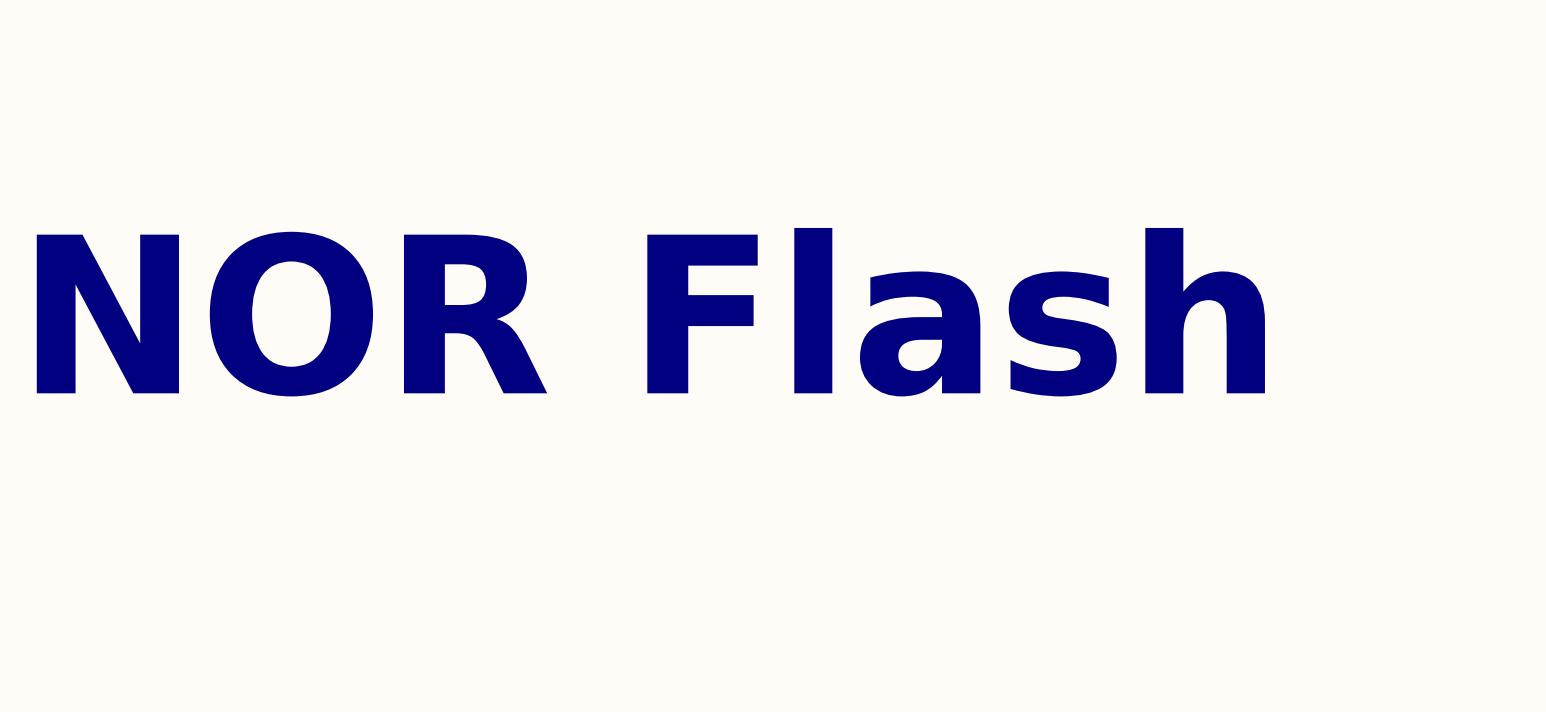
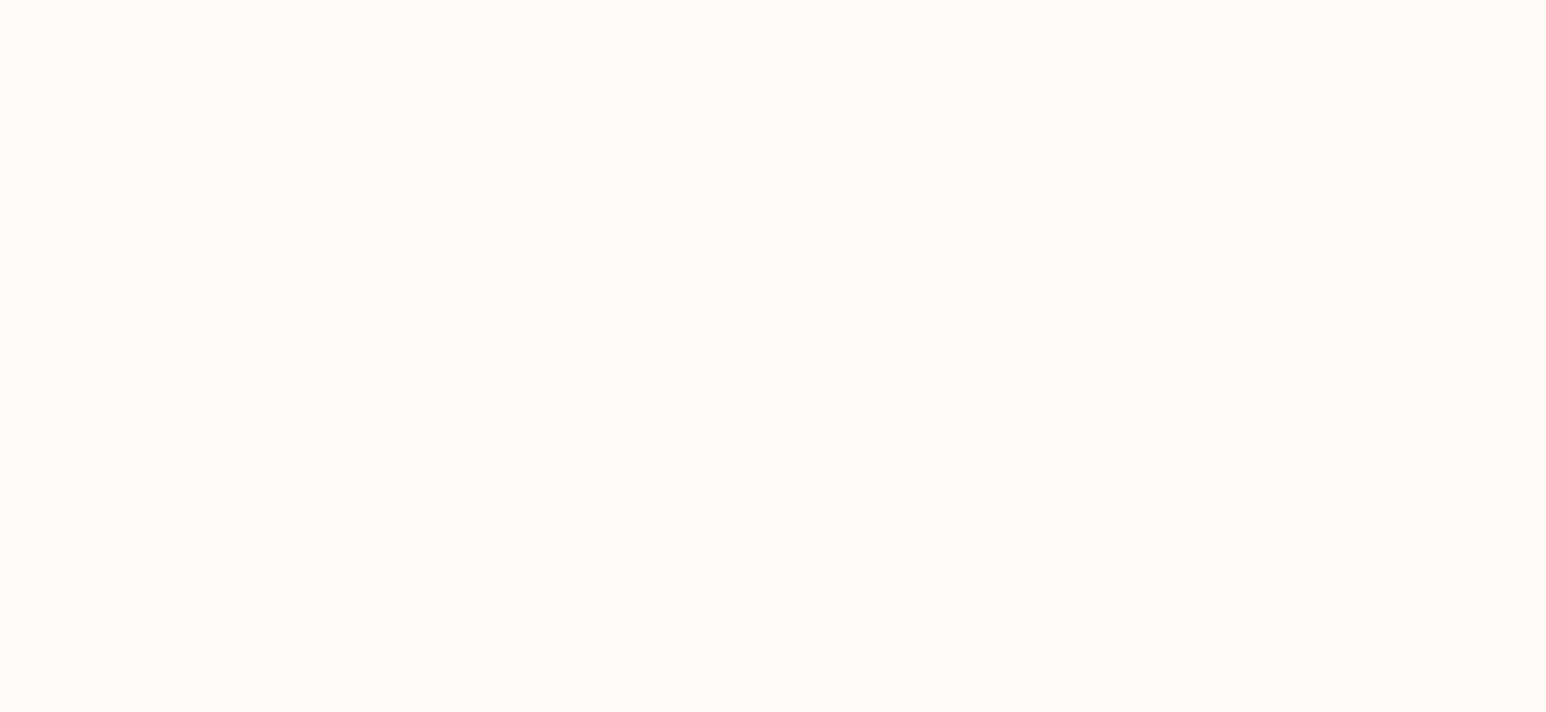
text: NOR Flash (650, 312) -> none

